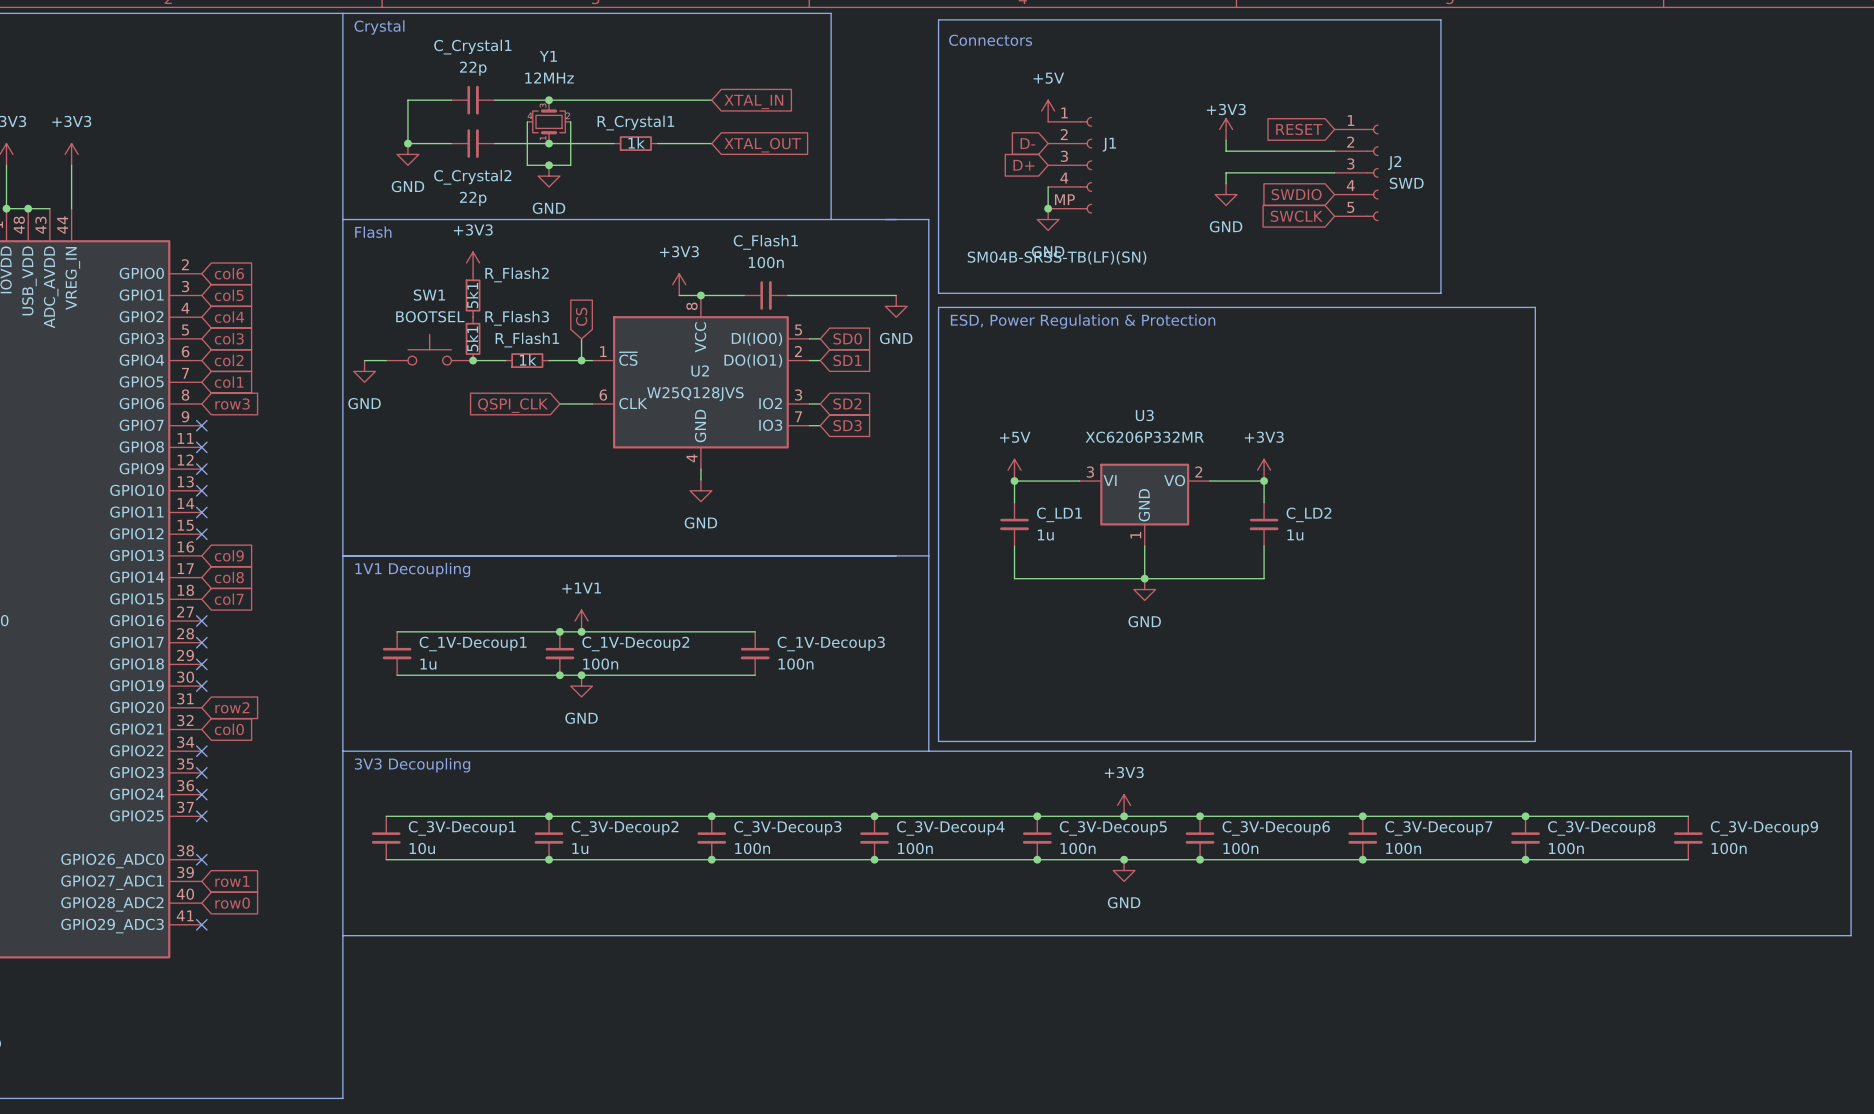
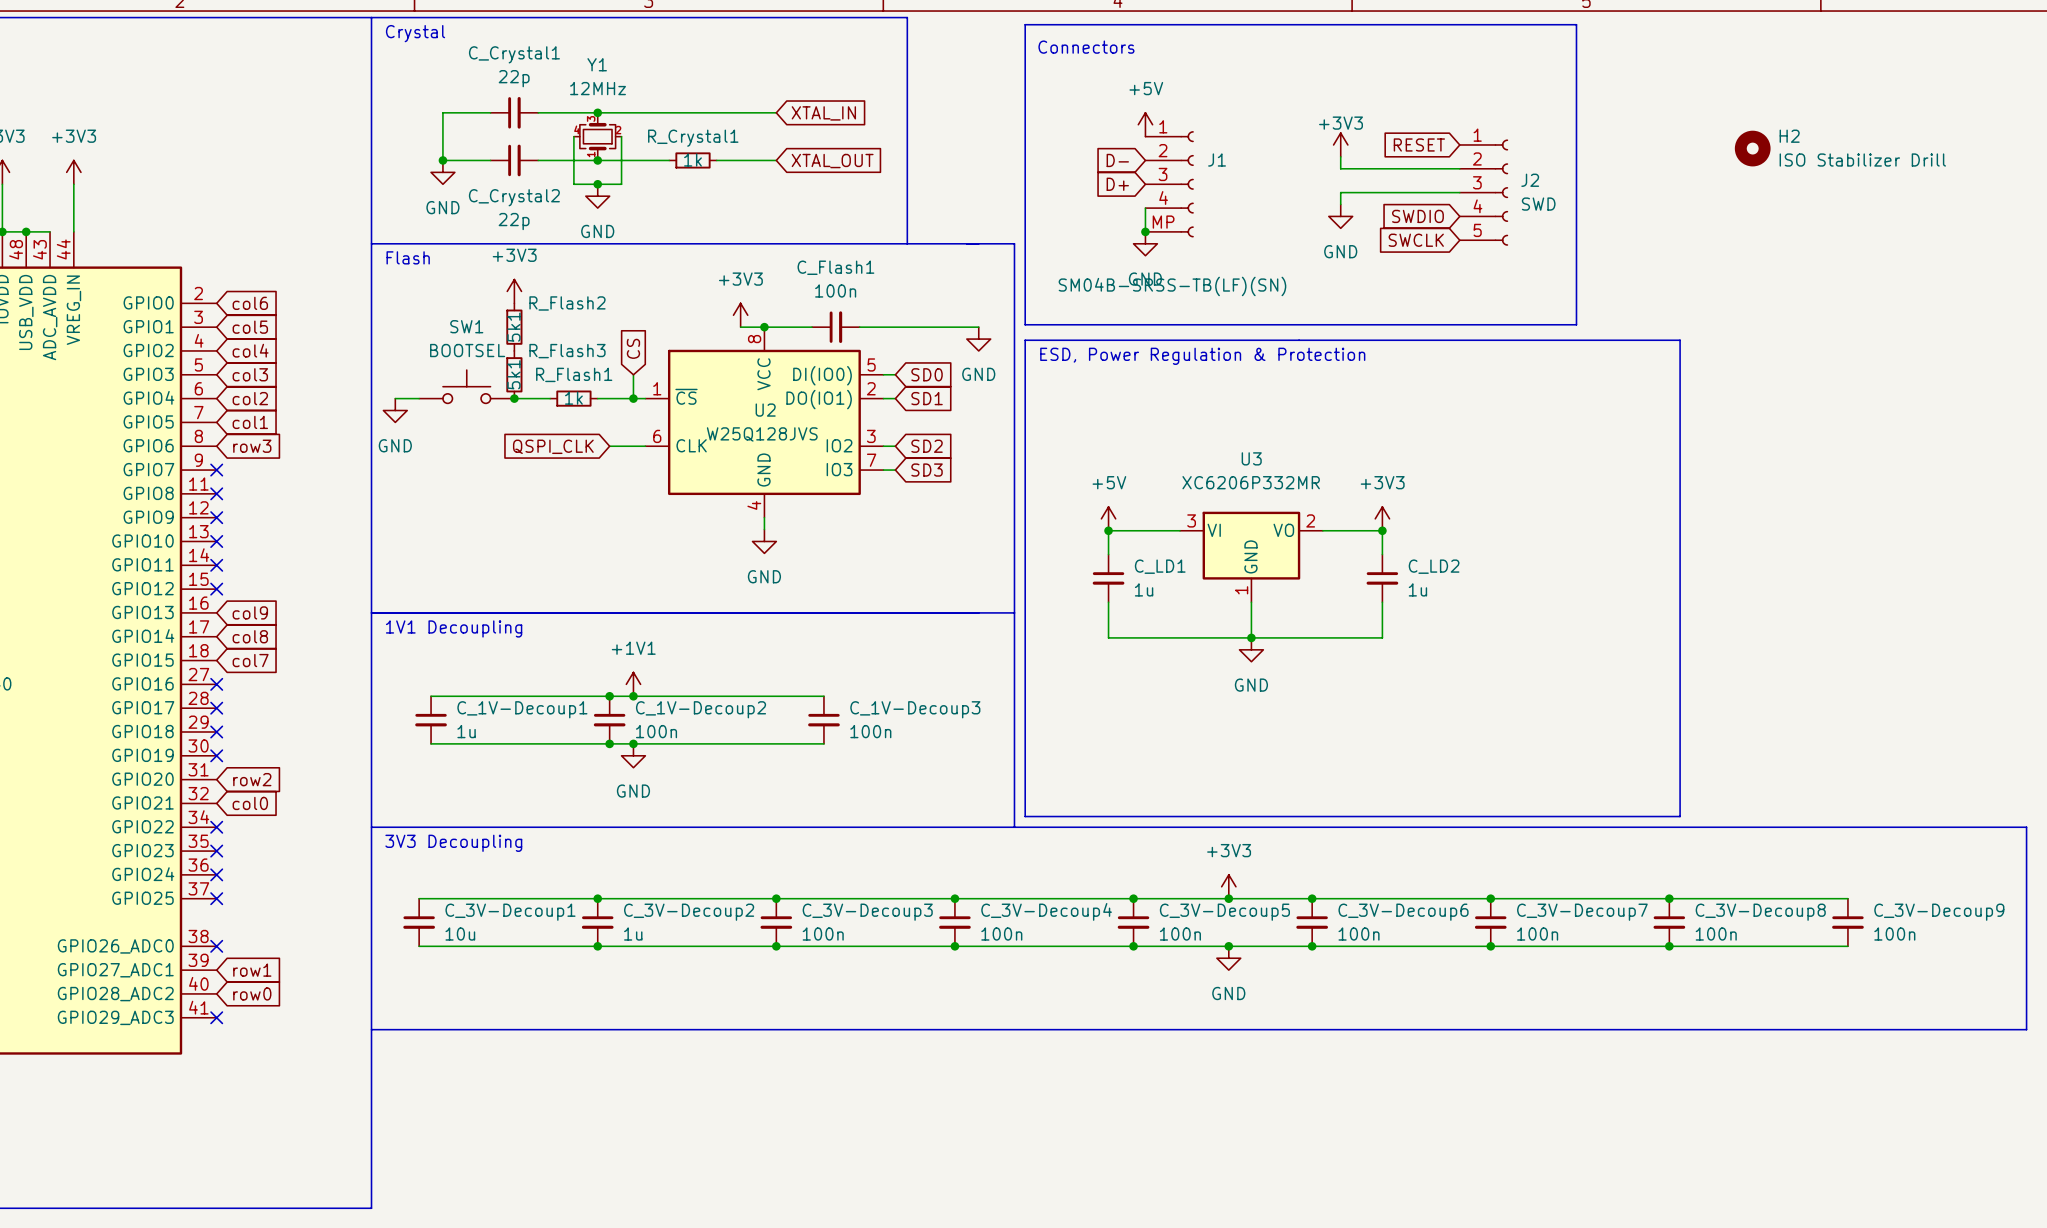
H2: none -> ISO Stabilizer Drill (1752, 148)

